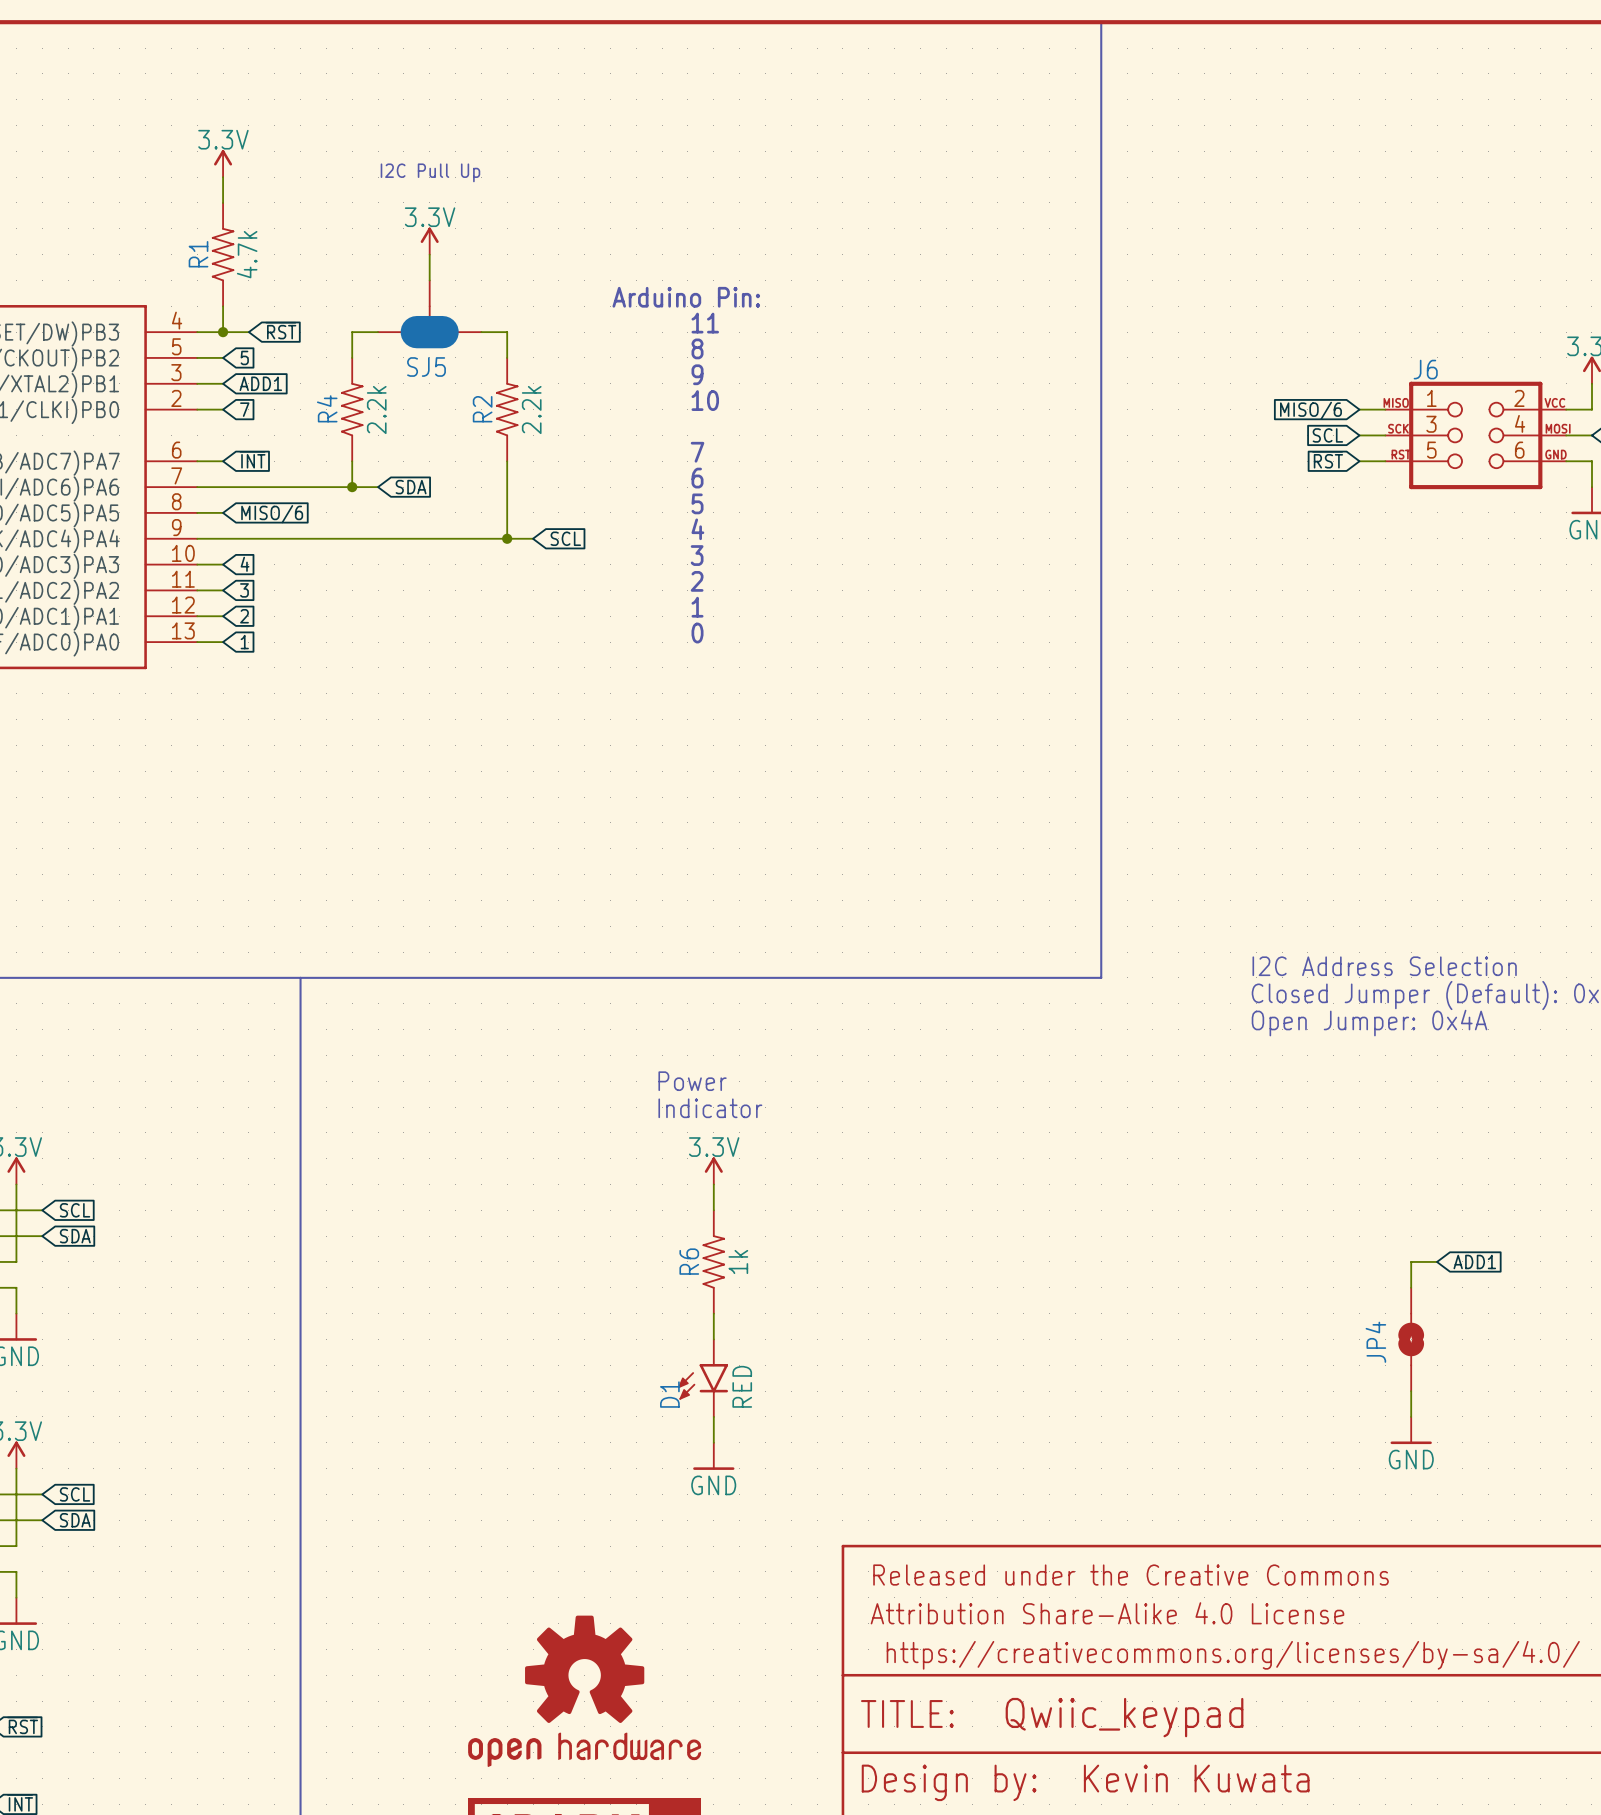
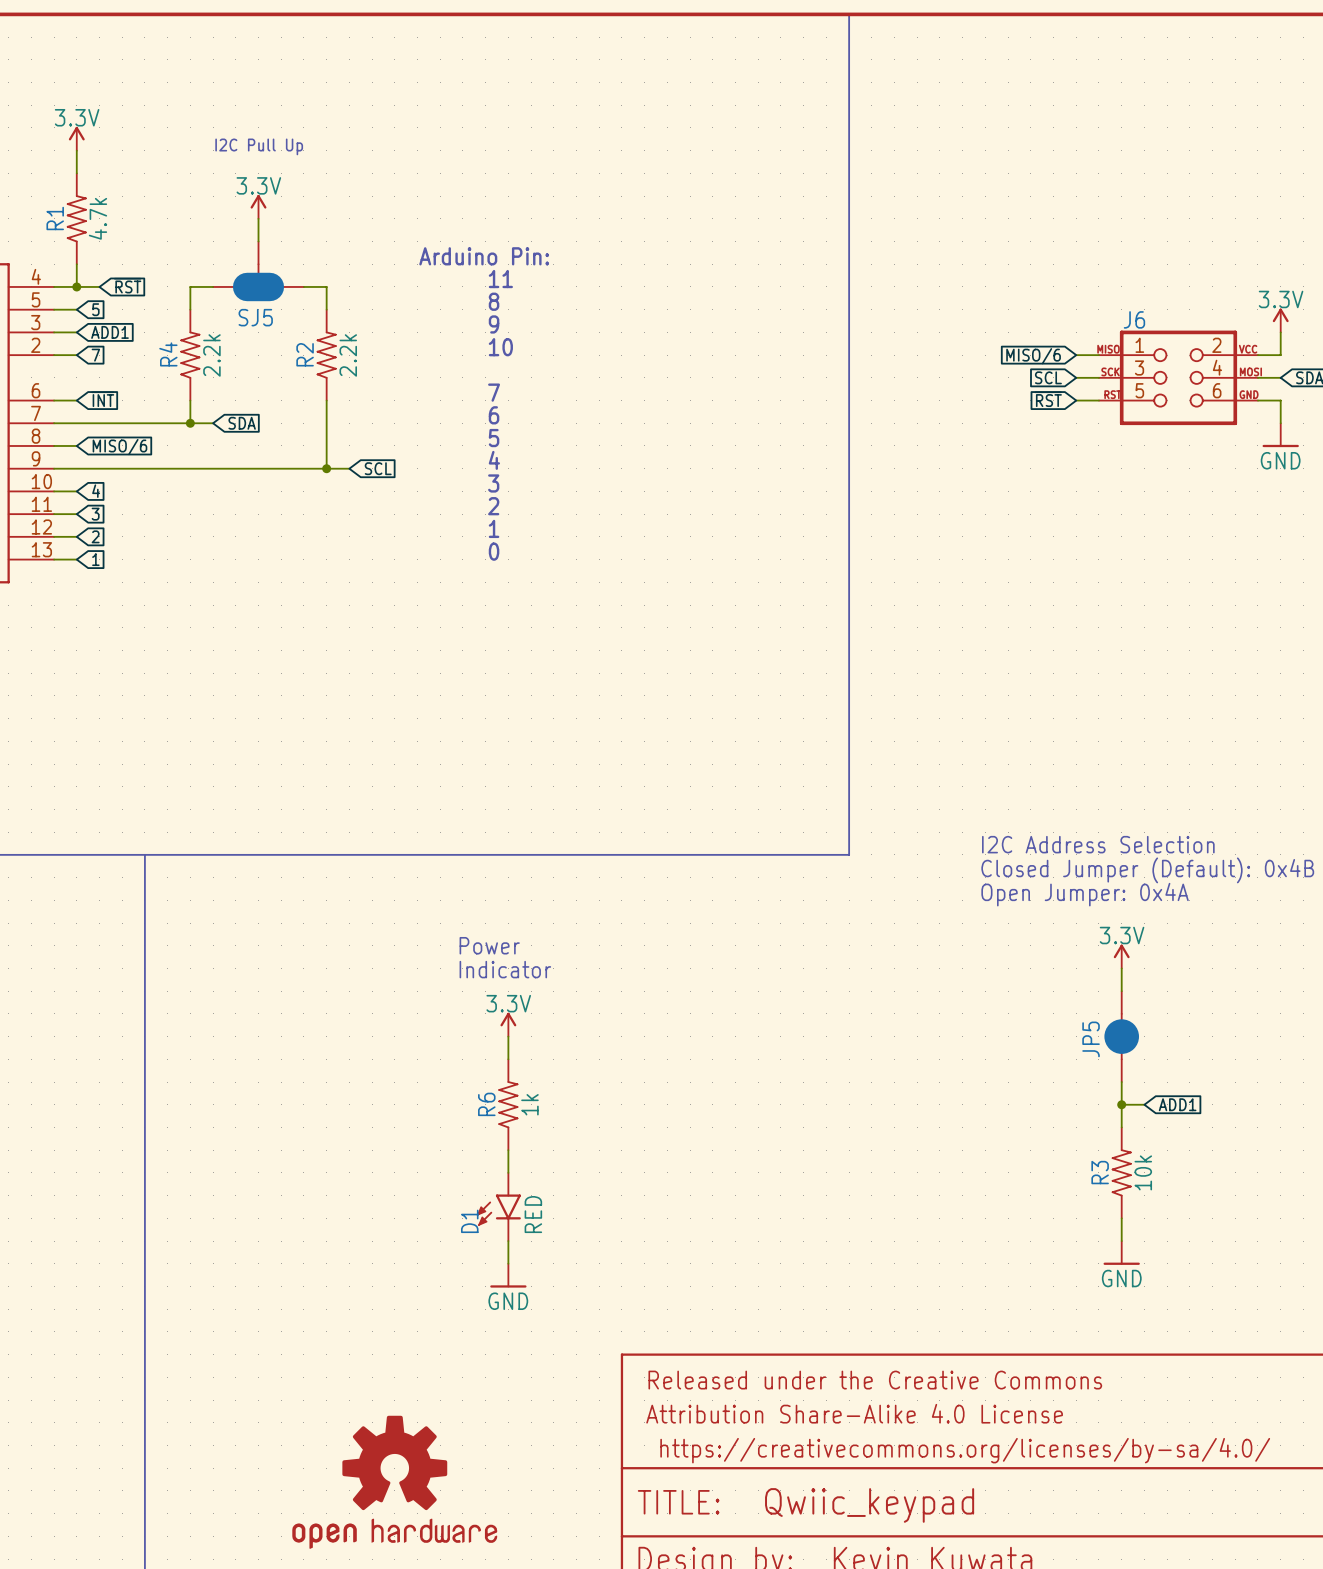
power symbol: none -> 3.3V (1121, 956)
wire: none -> (1121, 968) (1121, 991)
JP5: none -> (1121, 1036)
wire: none -> (1121, 1082) (1121, 1104)
junction: none -> (1121, 1104)
JP4: (1411, 1339) -> none
R3: none -> 10k (1121, 1172)

